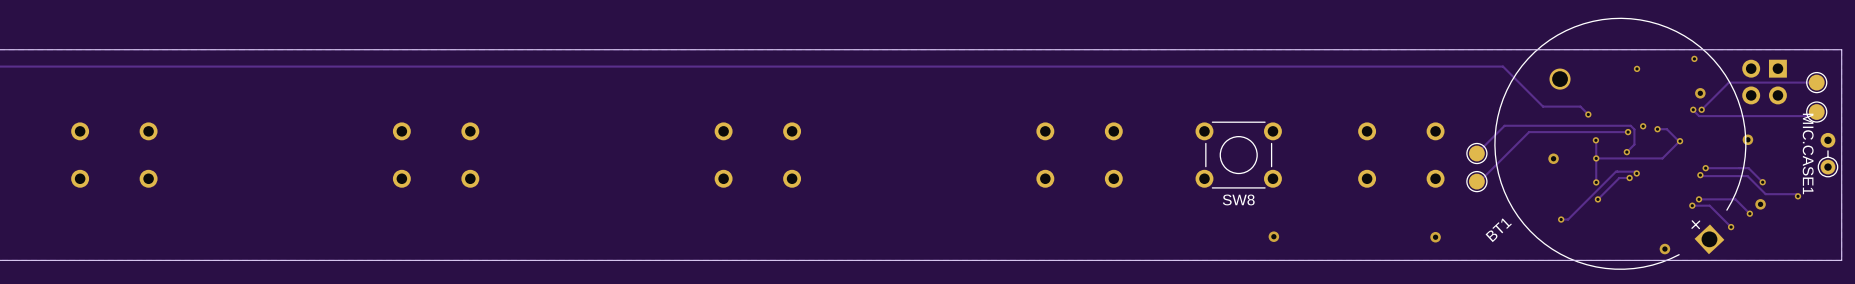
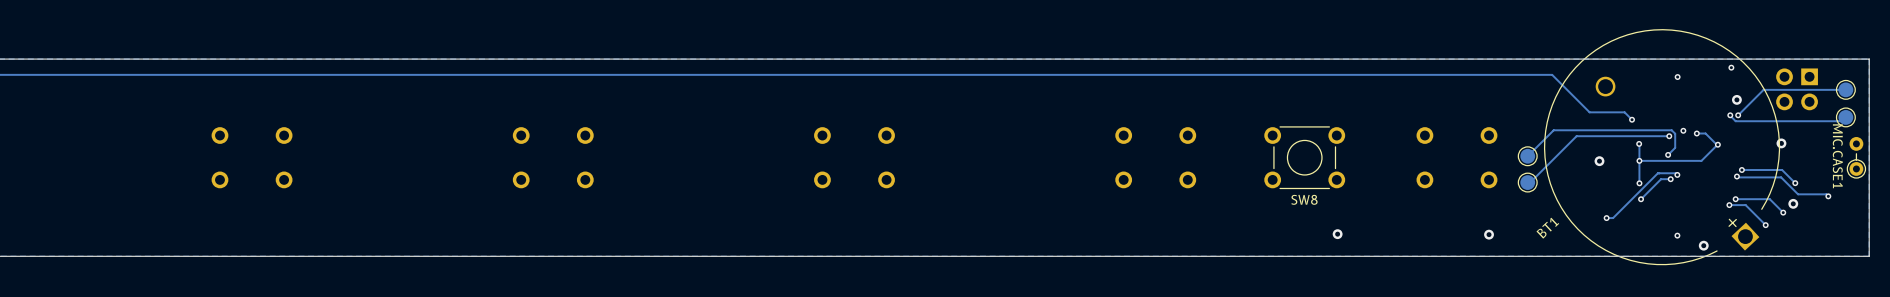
via: none -> (1677, 235)

